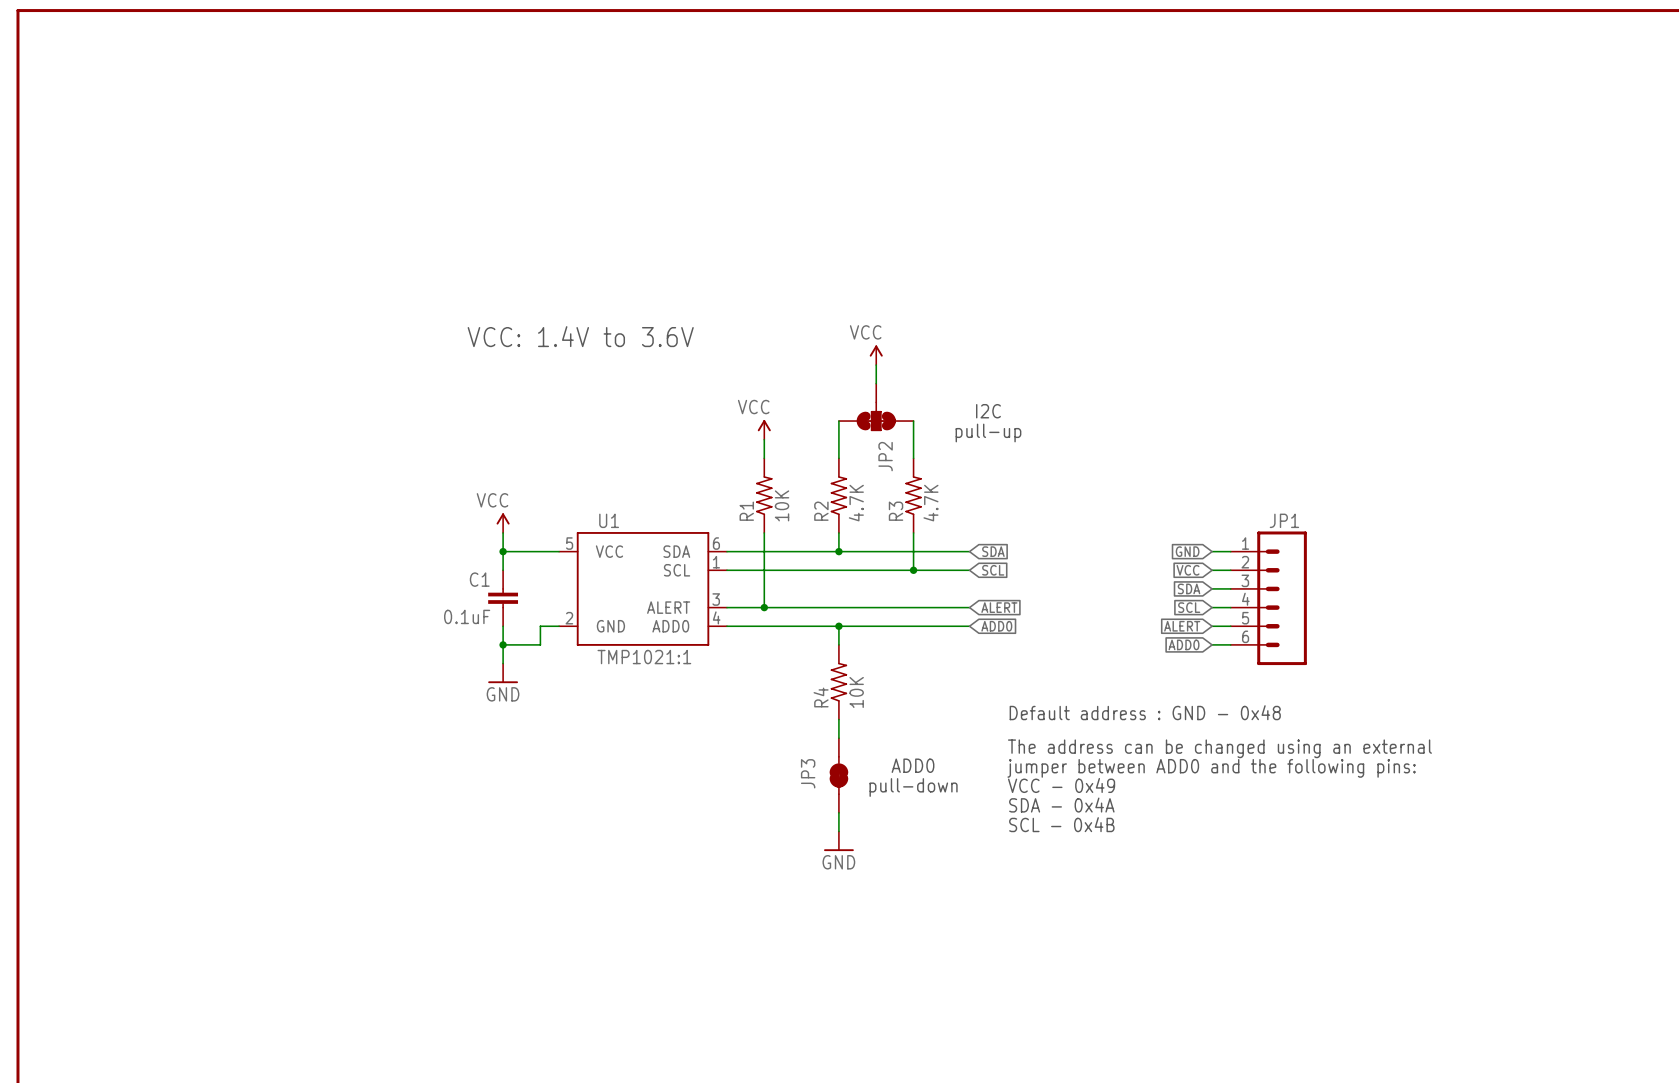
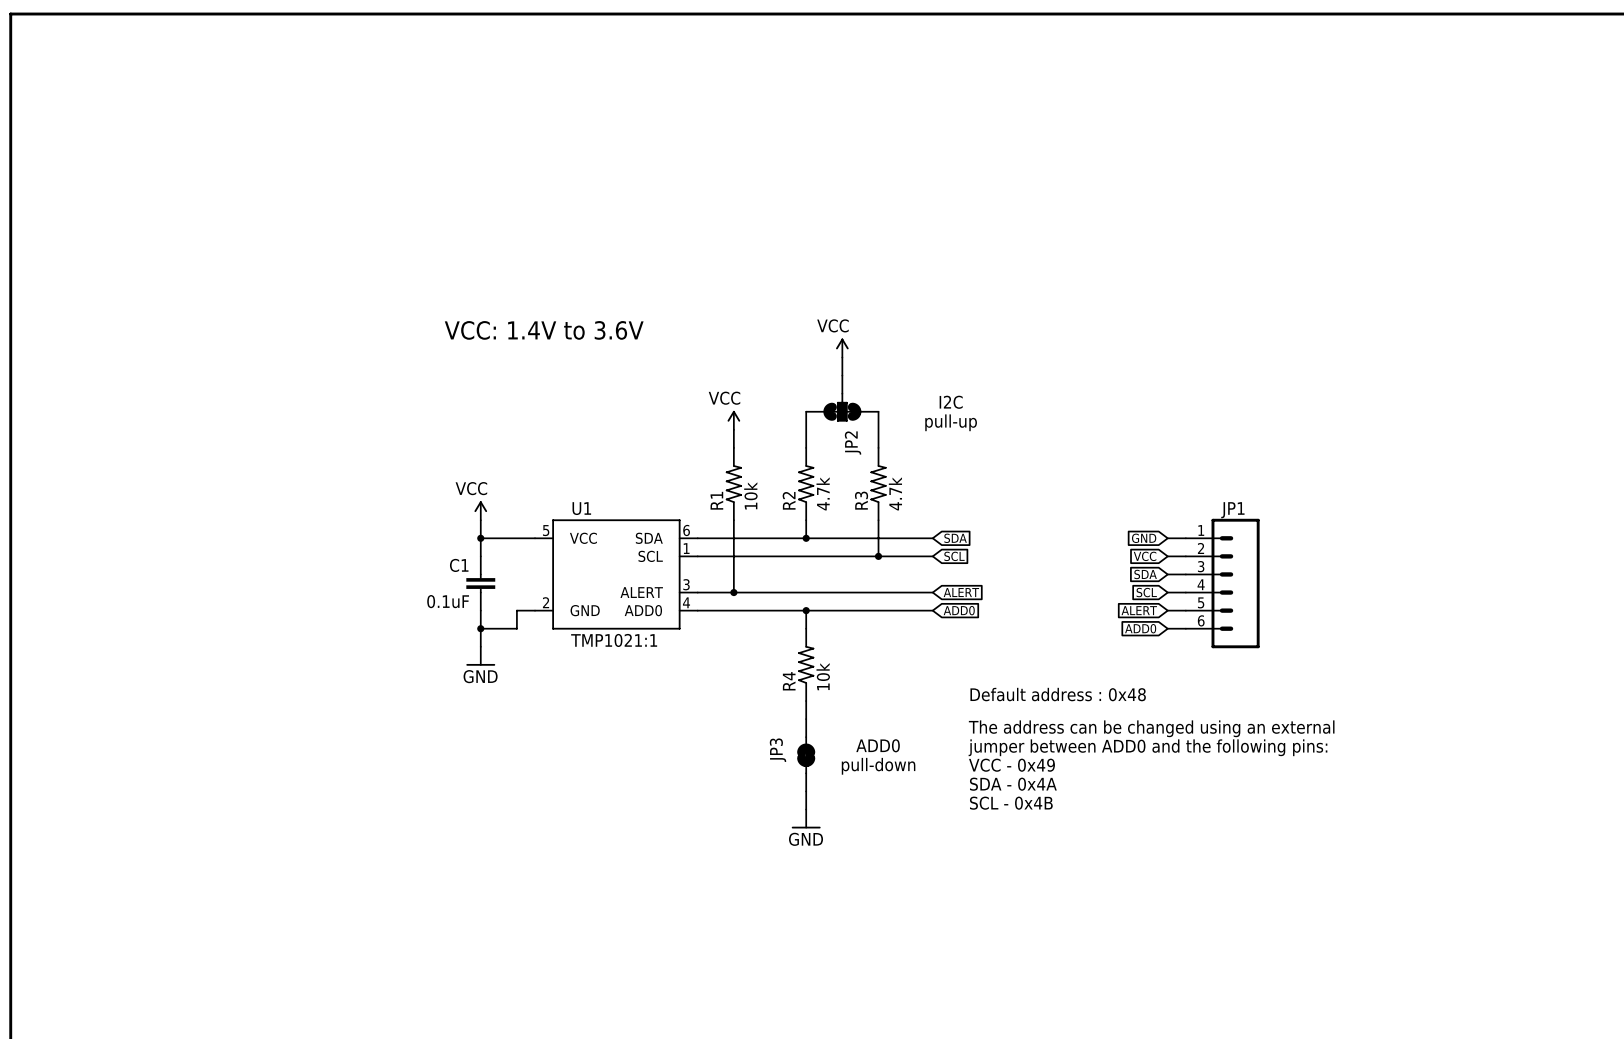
R2 value: 4.7K (856, 503) -> 4.7k (823, 493)
R3 value: 4.7K (930, 503) -> 4.7k (895, 493)
R1 value: 10K (782, 505) -> 10k (750, 495)
R4 value: 10K (856, 692) -> 10k (823, 676)
text: Default address : GND - 0x48 (1145, 712) -> Default address : 0x48 (1058, 694)

